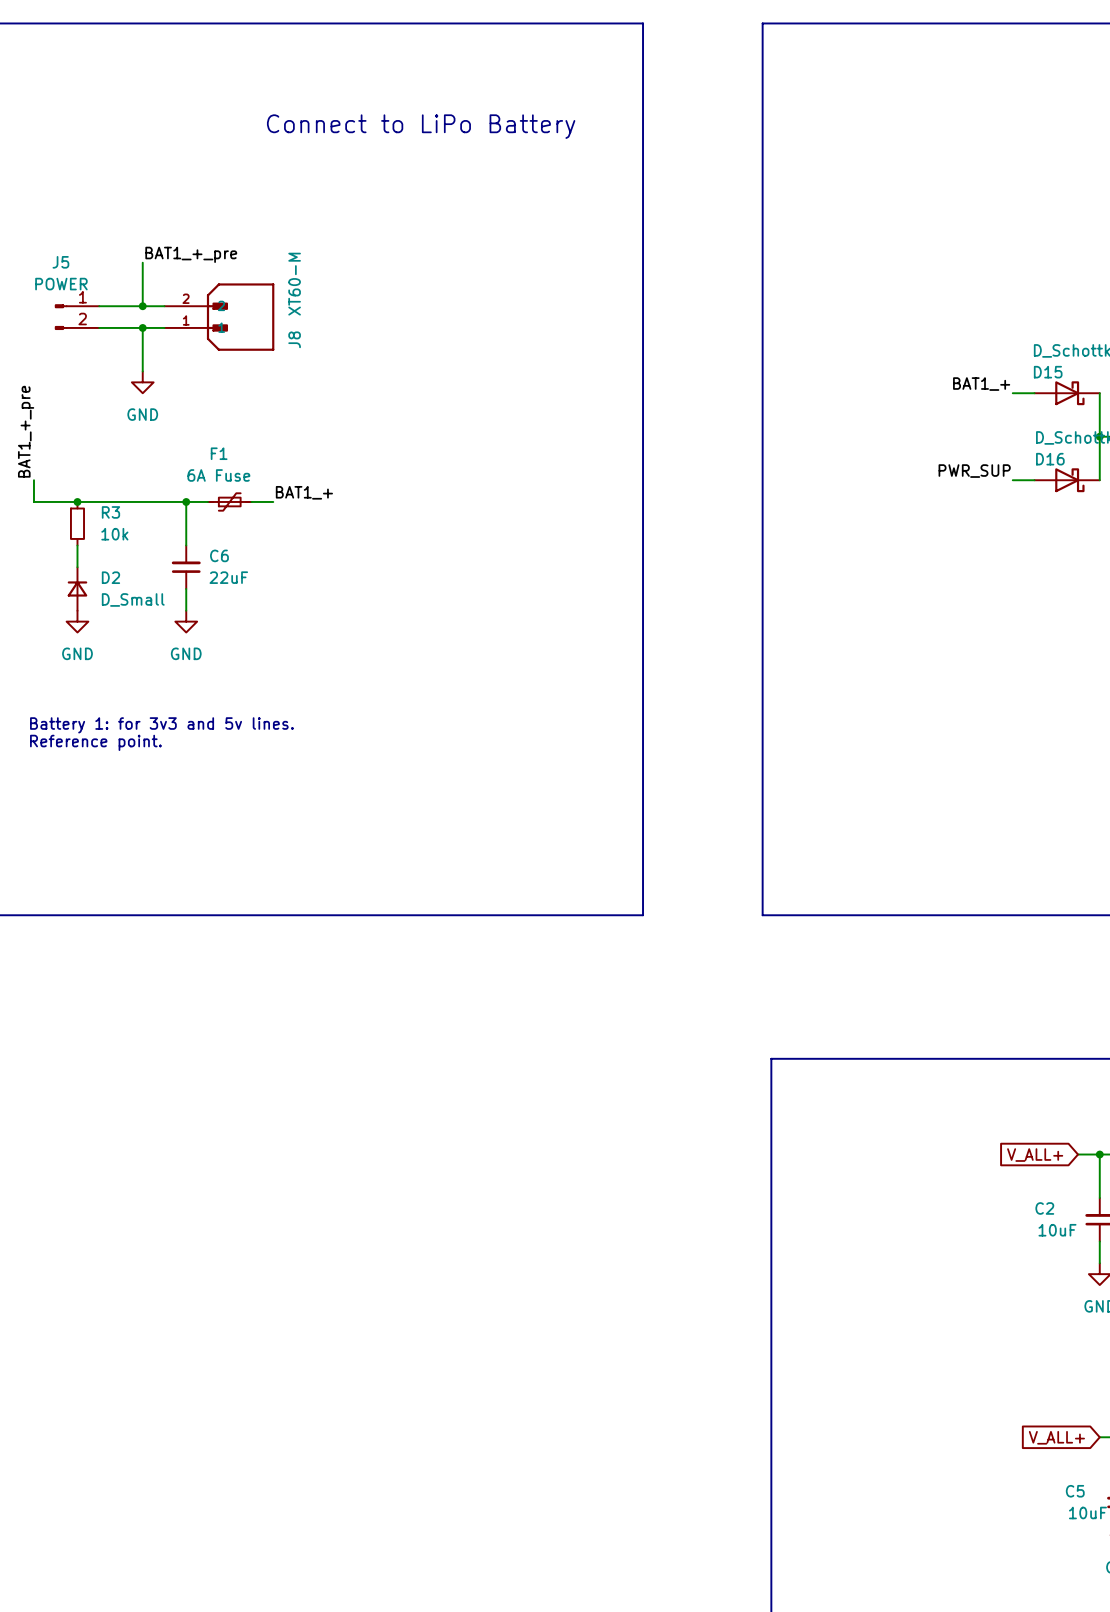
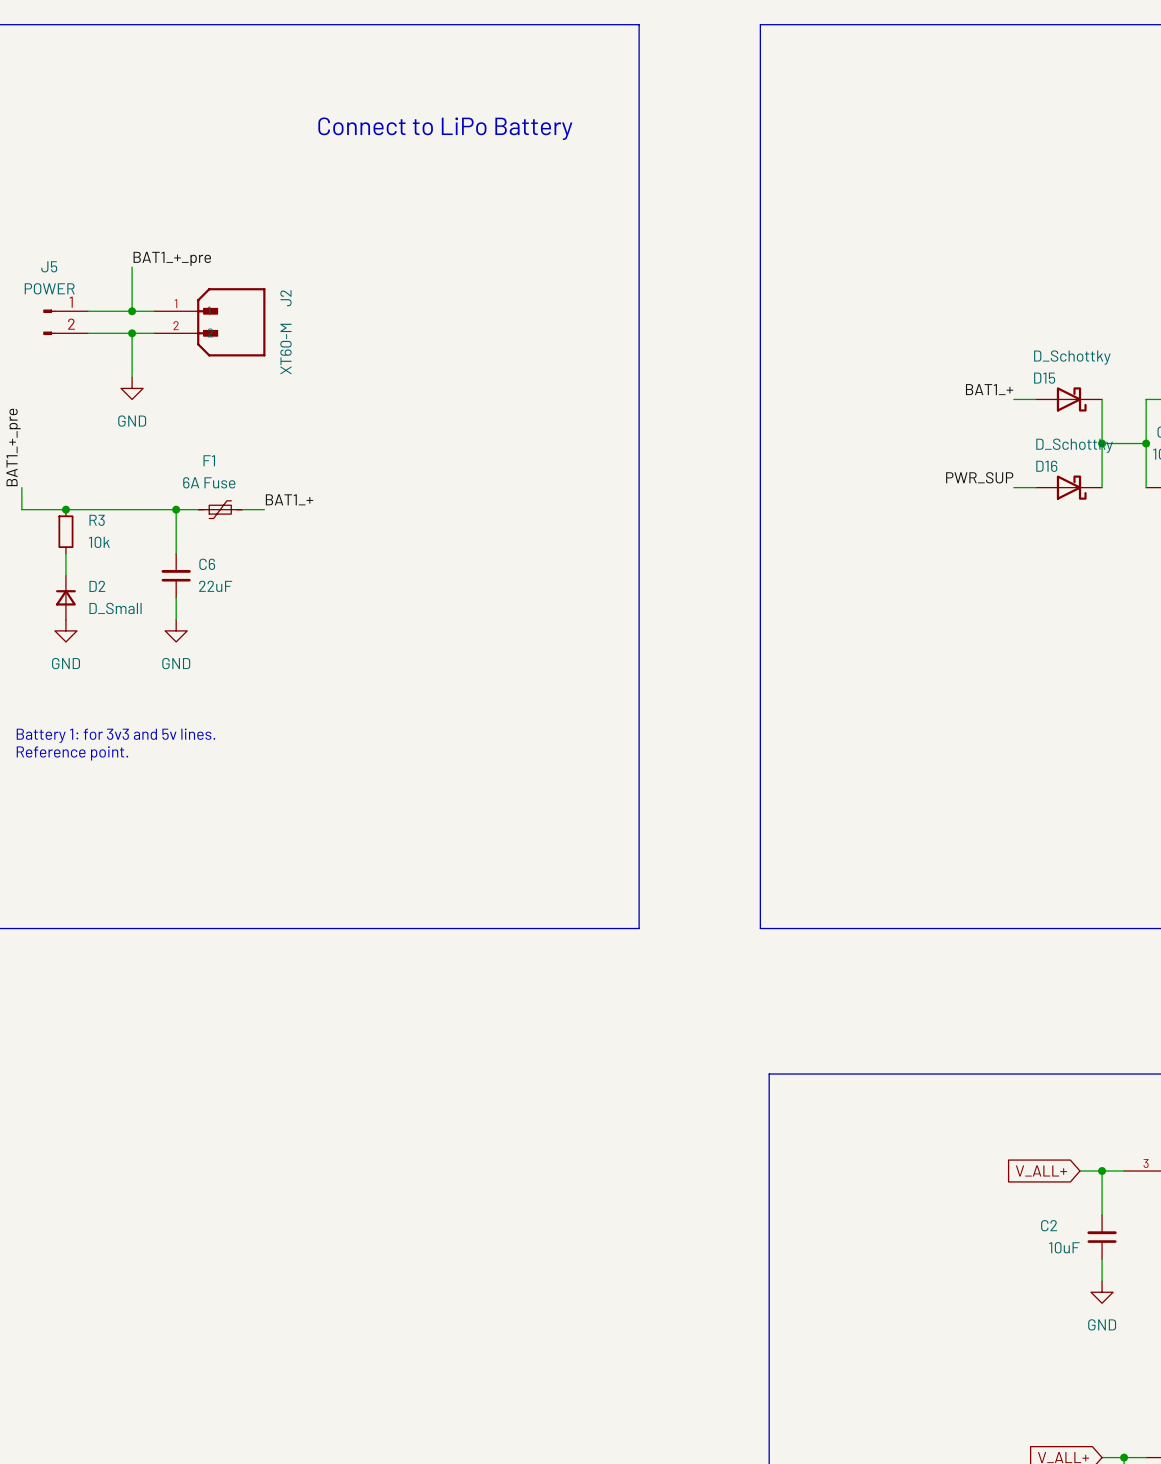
J8: XT60-M (219, 317) -> none
J2: none -> XT60-M (209, 322)

